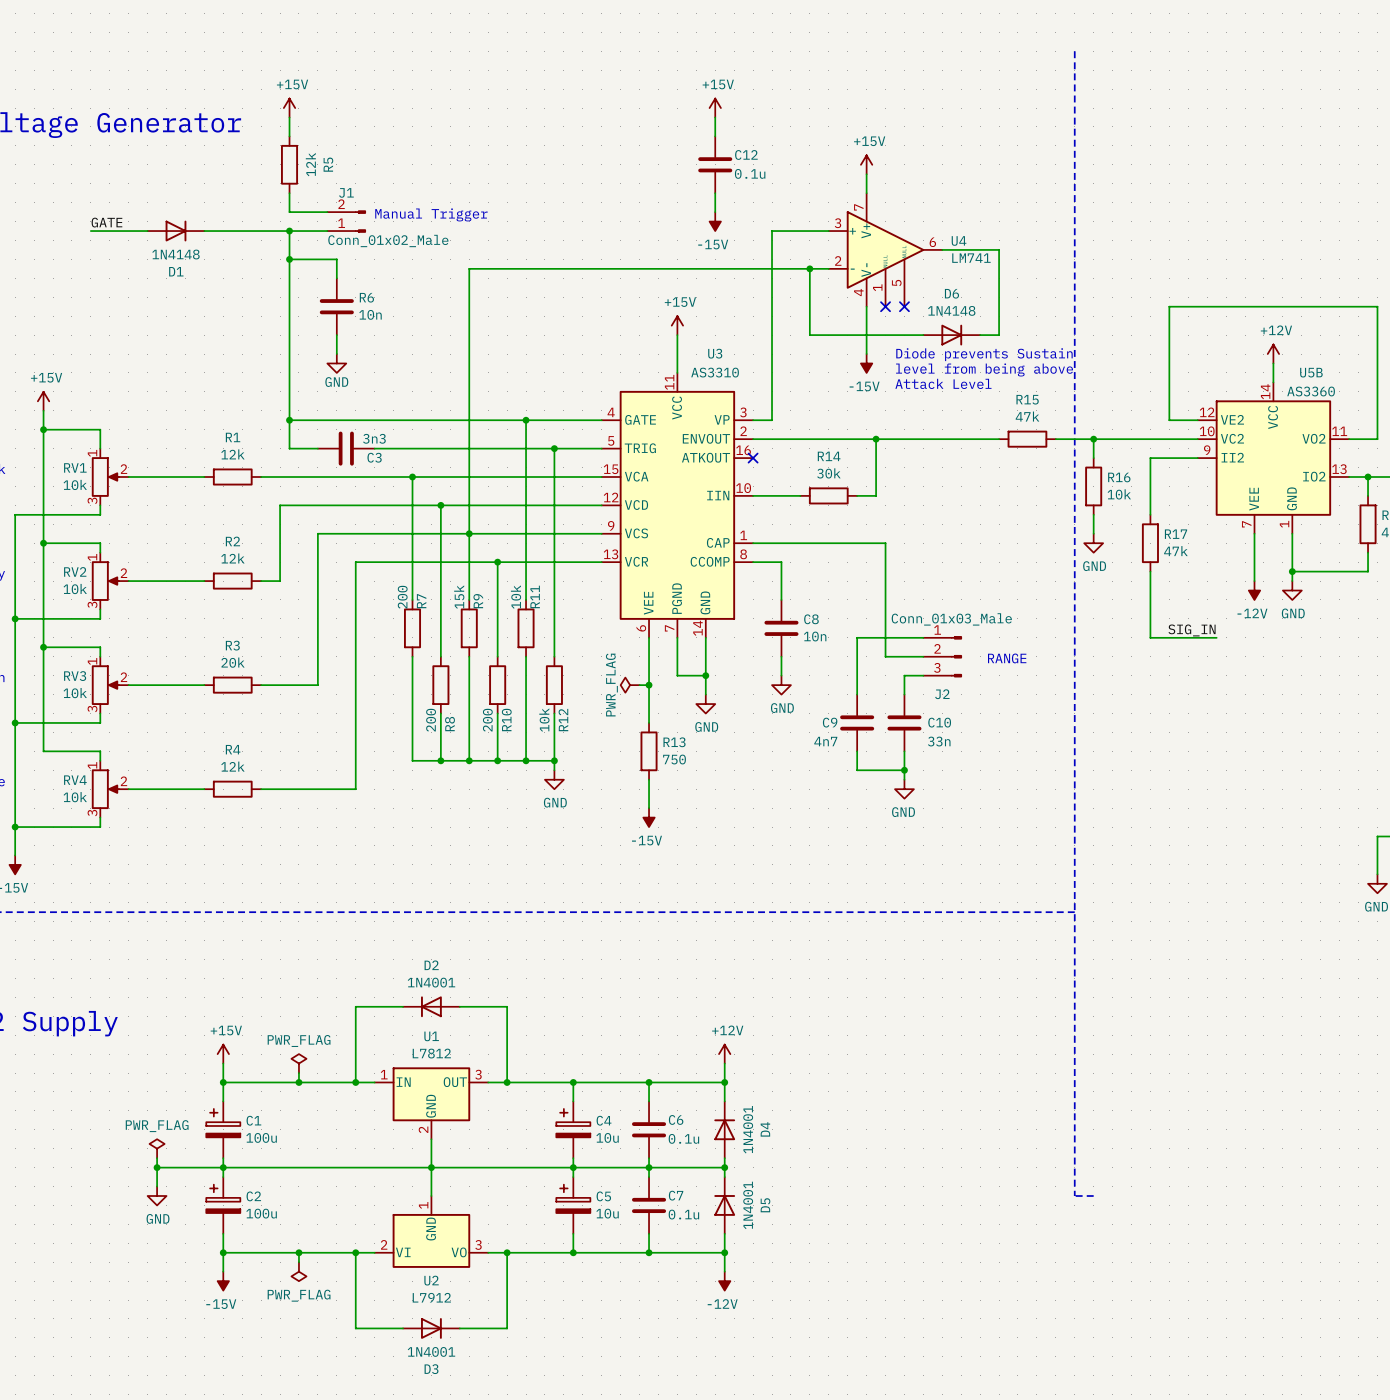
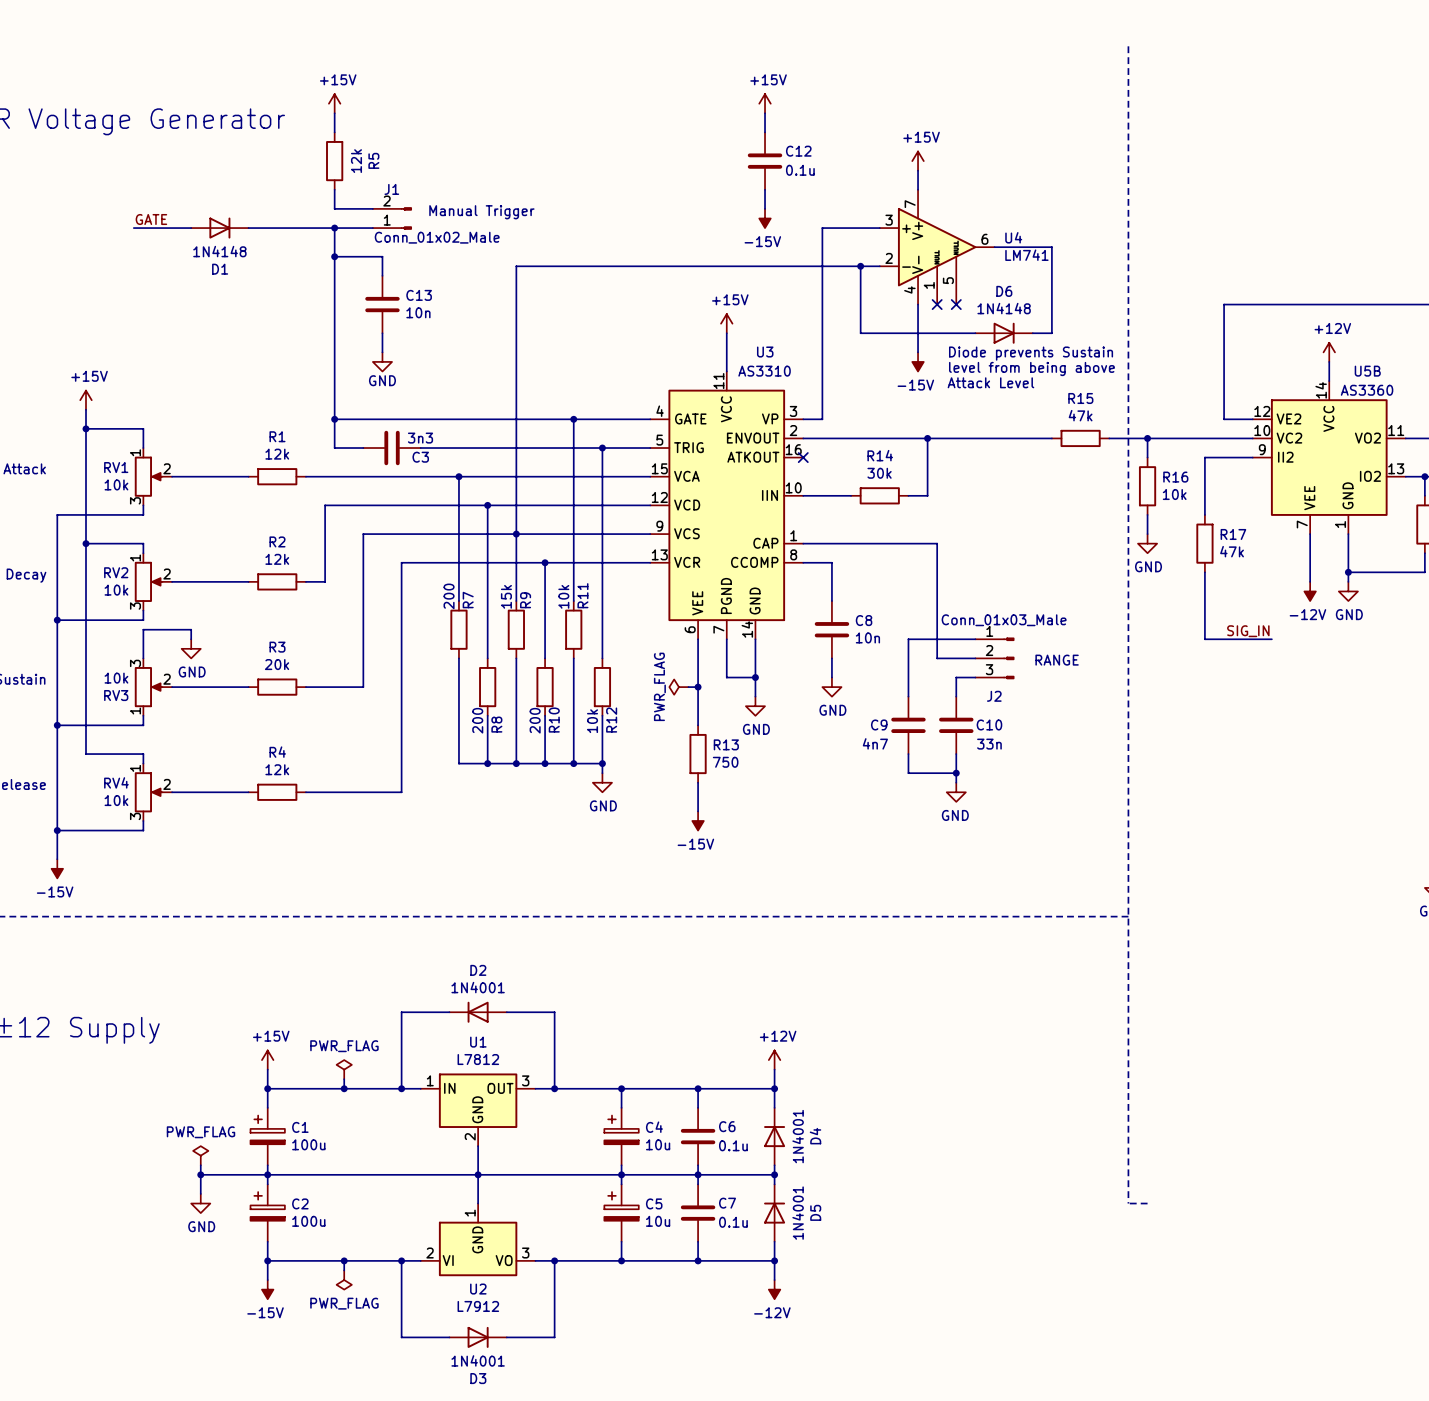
R6 name: R6 (366, 297) -> C13 (419, 295)
wire: (43, 647) (100, 647) -> (191, 639) (191, 629) (143, 629) (143, 648)
junction: (43, 647) -> none
power symbol: none -> GND (191, 648)
RV3 flip: as is (105, 685) -> up-down (148, 687)

